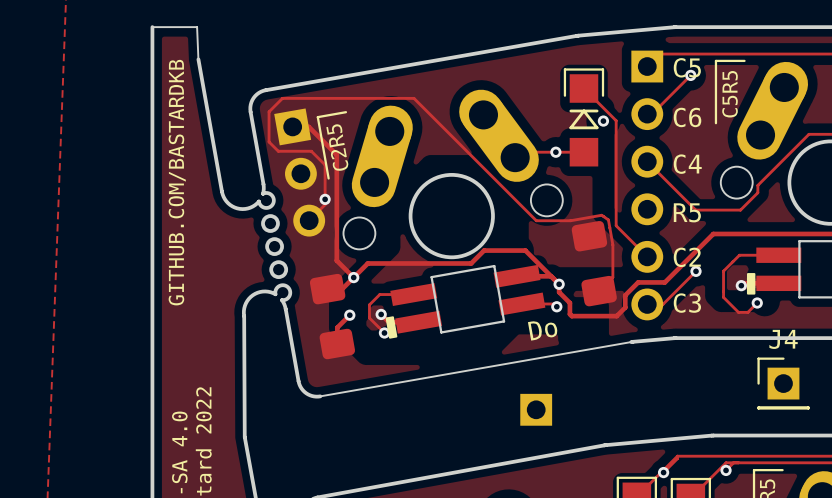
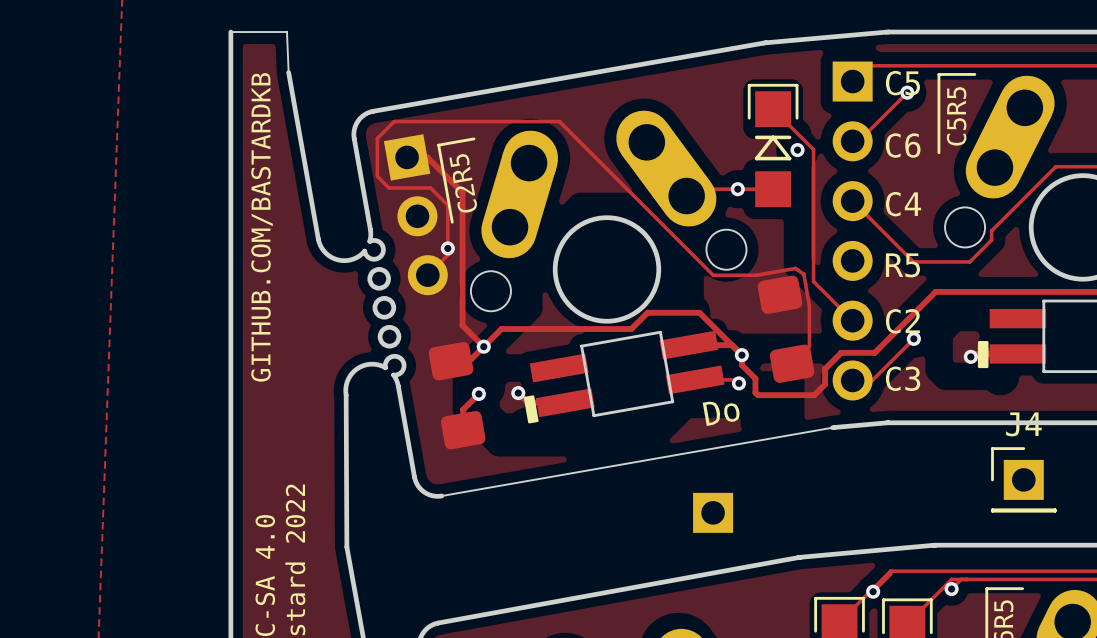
track: (778, 255) (739, 255) (723, 271) (723, 297) (738, 312) (747, 312) (757, 303) -> none
track: (413, 294) (379, 294) (369, 304) (369, 318) (384, 332) -> none
via: (757, 303) -> none
via: (384, 332) -> none

